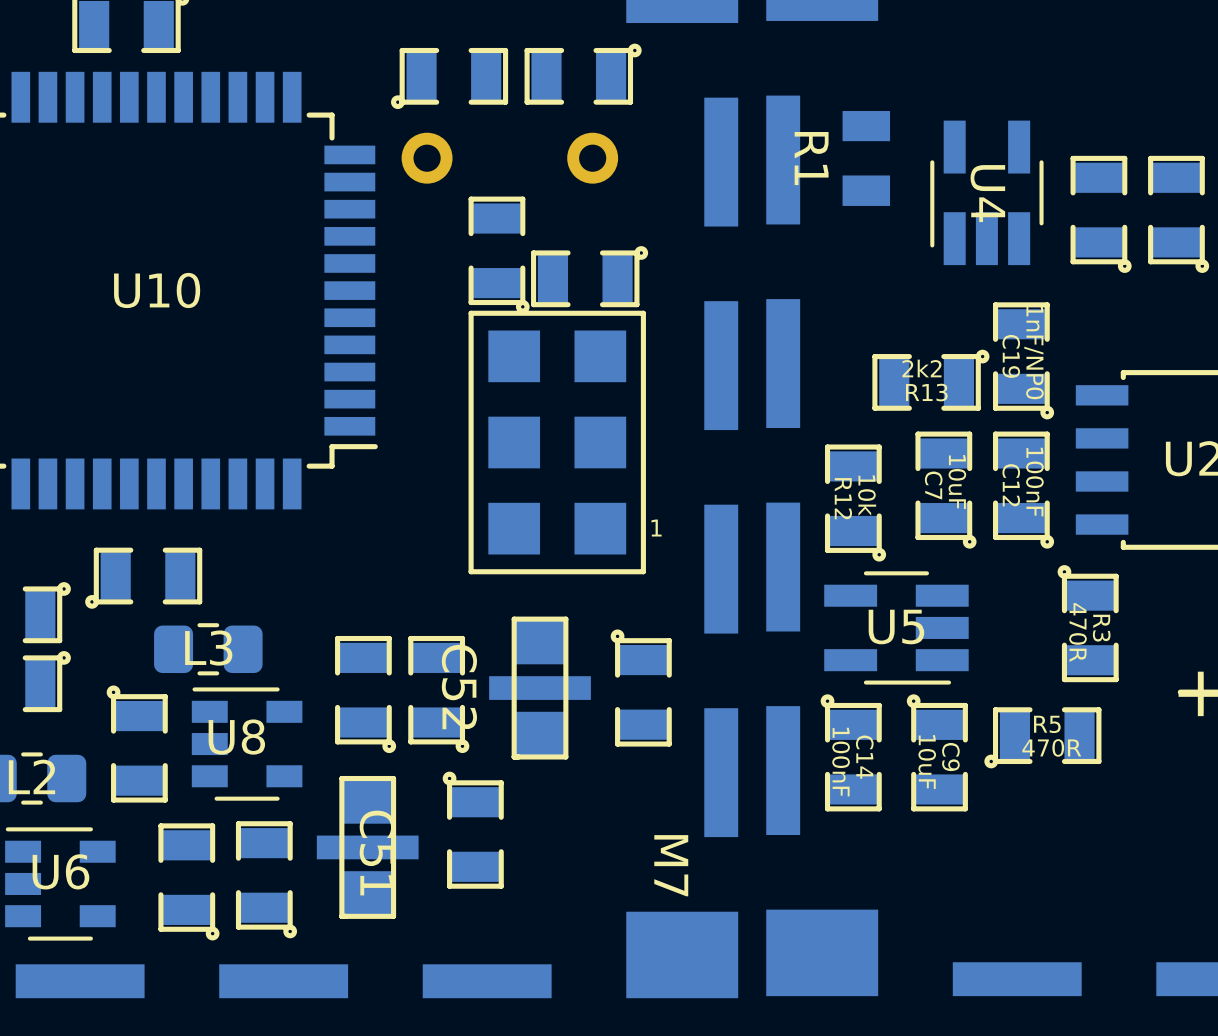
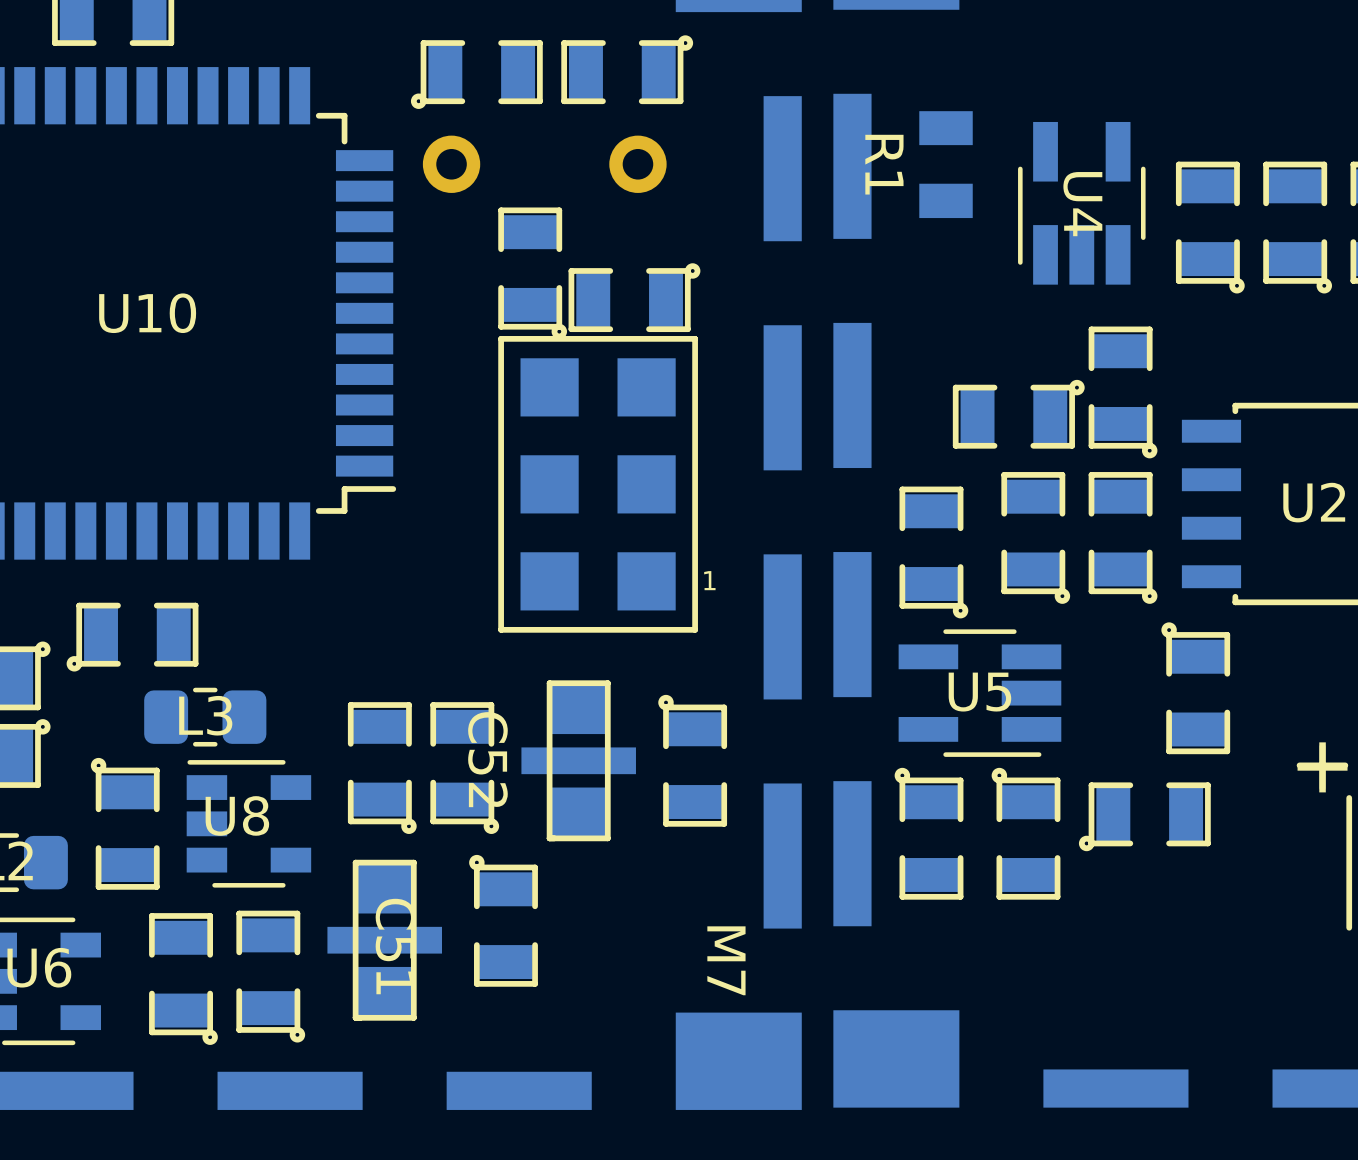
C19 value: 1nF/NP0 (1034, 352) -> none
C19 name: C19 (1011, 356) -> none
R13 value: 2k2 (921, 368) -> none
R13 name: R13 (926, 392) -> none
C7 value: 10uF (957, 482) -> none
C12 value: 100nF (1034, 482) -> none
C7 name: C7 (933, 485) -> none
C12 name: C12 (1011, 485) -> none
R12 value: 10k (867, 495) -> none
R12 name: R12 (843, 498) -> none
R3 name: R3 (1101, 628) -> none
R3 value: 470R (1078, 632) -> none
R5 name: R5 (1047, 724) -> none
R5 value: 470R (1051, 747) -> none
C14 name: C14 (864, 757) -> none
C9 name: C9 (950, 757) -> none
C14 value: 100nF (841, 762) -> none
C9 value: 10uF (927, 762) -> none

